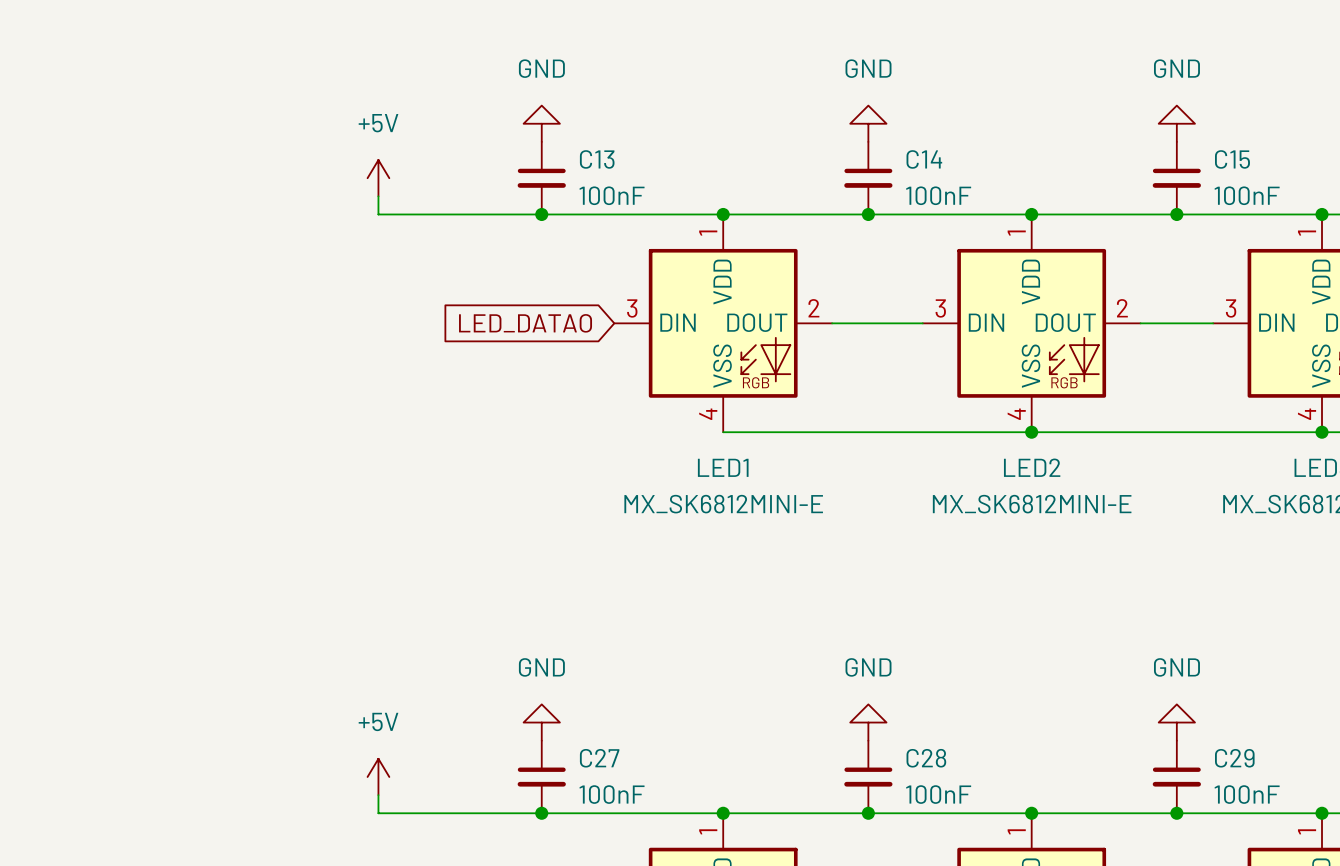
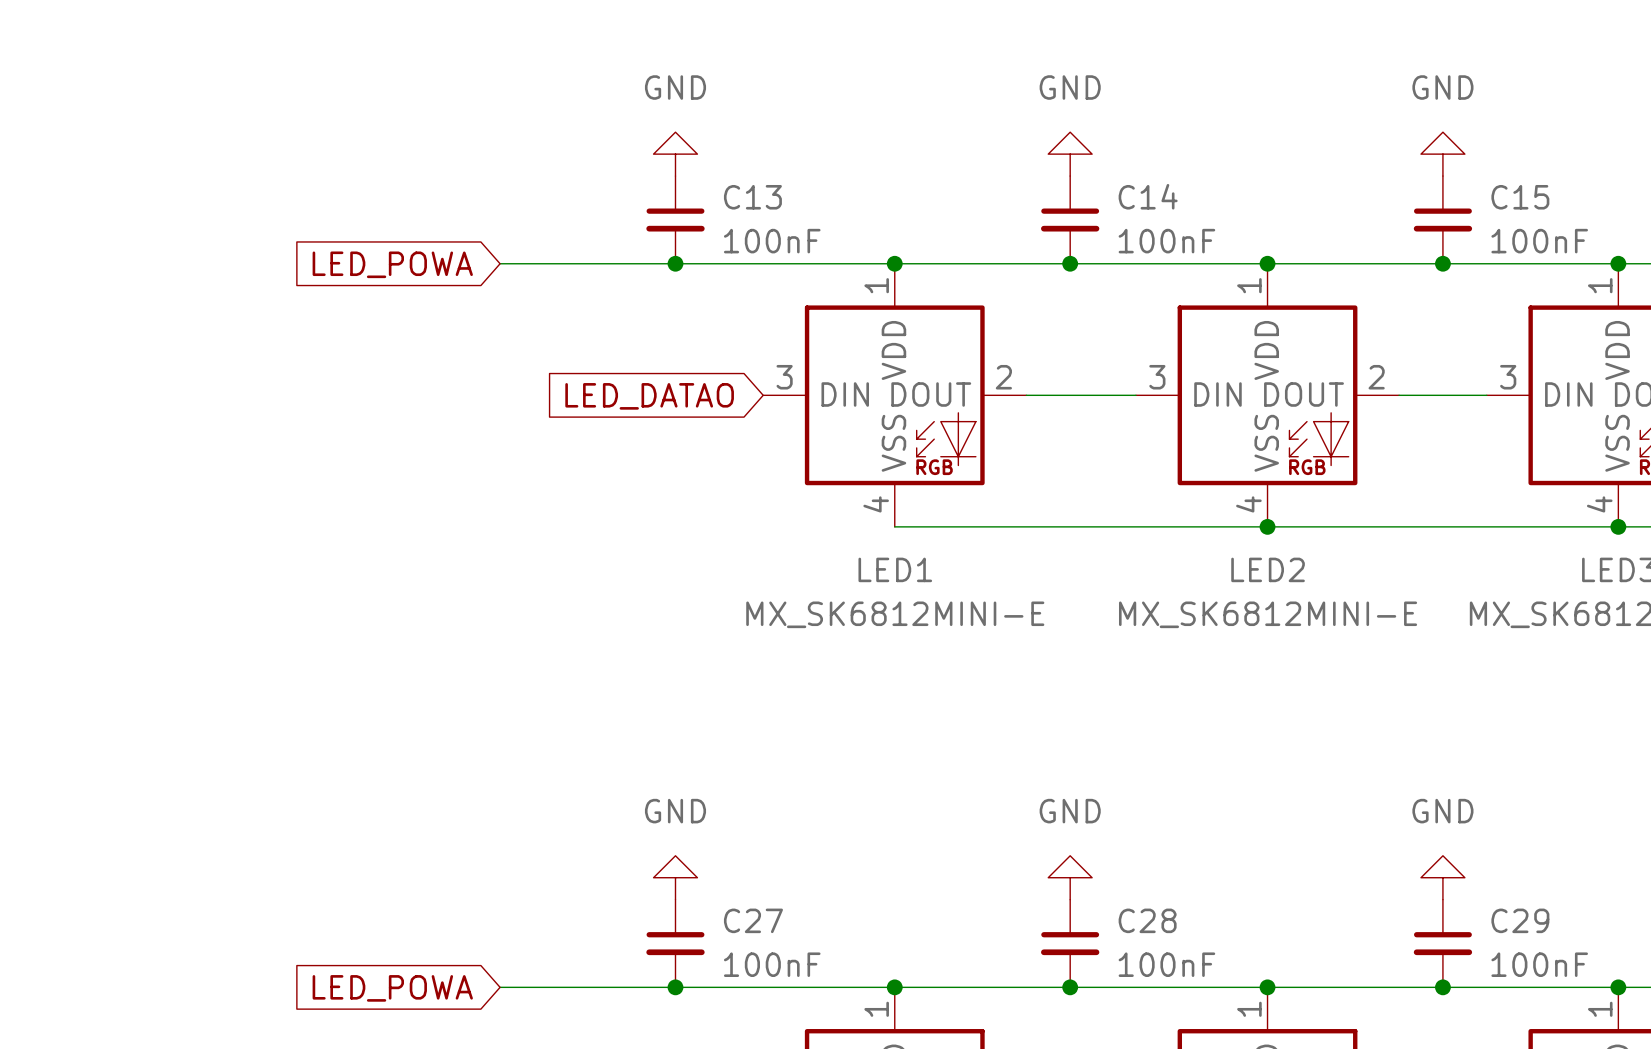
power symbol: +5V (378, 178) -> none
wire: (378, 196) (378, 214) (396, 214) -> none
global label: none -> LED_POWA (392, 264)
power symbol: +5V (378, 776) -> none
wire: (378, 795) (378, 813) (396, 813) -> none
global label: none -> LED_POWA (392, 988)

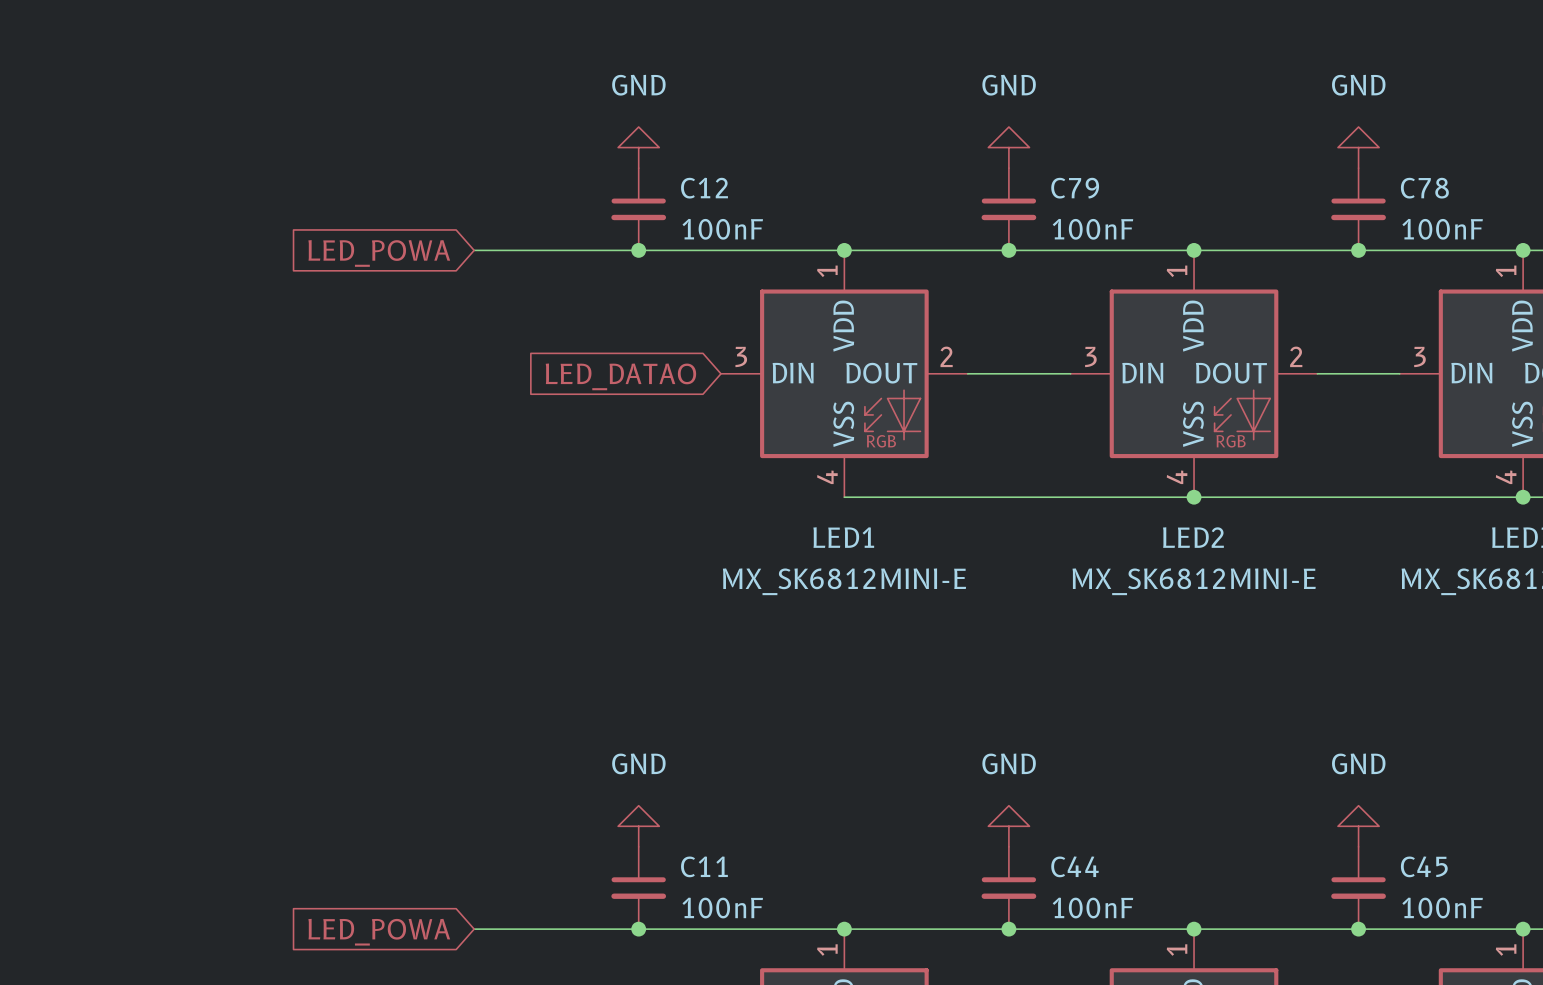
C14 name: C14 (1148, 196) -> C79 (1075, 188)
C13 name: C13 (752, 197) -> C12 (704, 188)
C15 name: C15 (1520, 197) -> C78 (1424, 188)
C27 name: C27 (753, 920) -> C11 (704, 866)
C28 name: C28 (1147, 920) -> C44 (1075, 866)
C29 name: C29 (1520, 920) -> C45 (1424, 866)

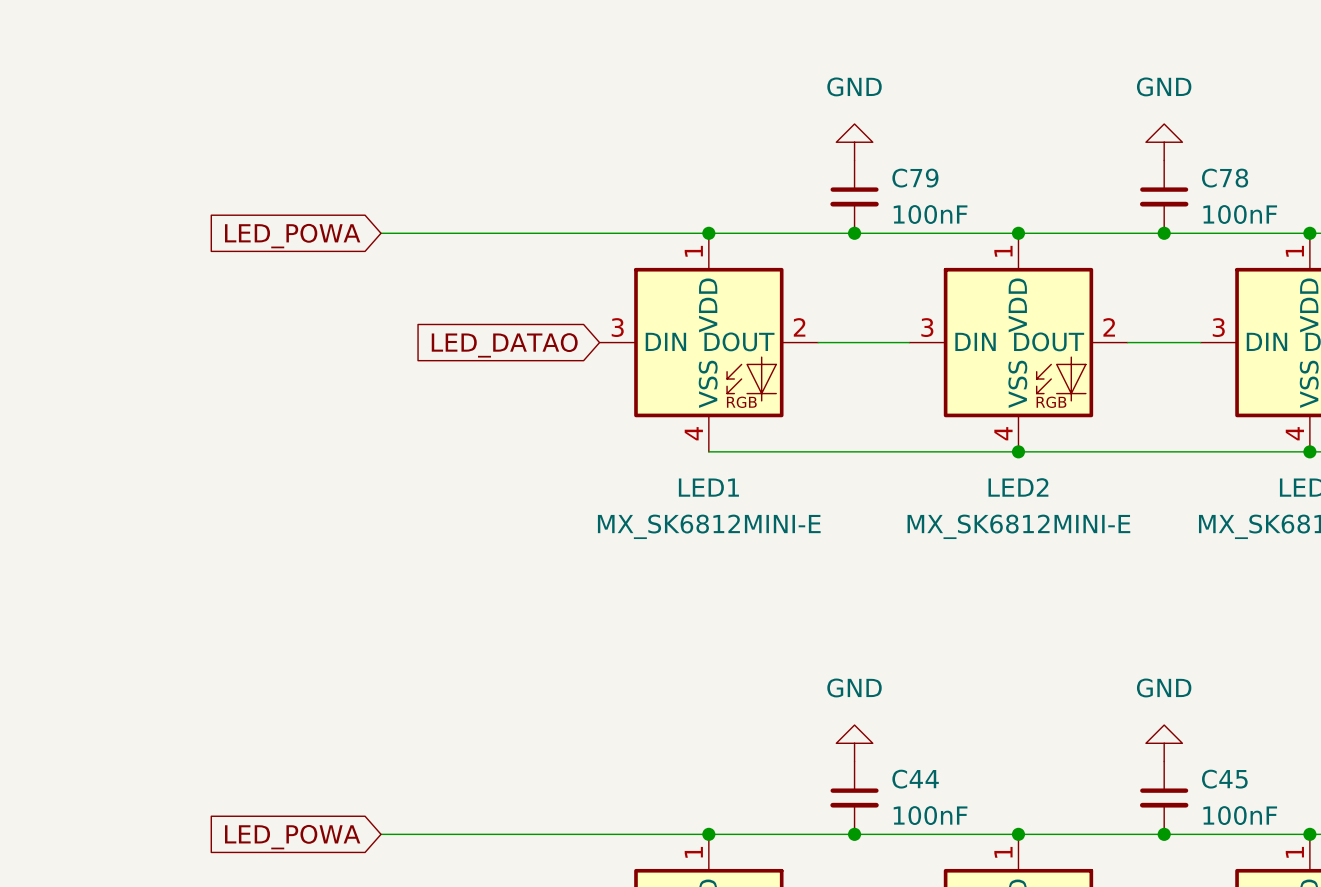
power symbol: GND (638, 147) -> none
C12: 100nF (638, 209) -> none
junction: (638, 250) -> none
power symbol: GND (638, 826) -> none
C11: 100nF (638, 887) -> none
junction: (638, 929) -> none

